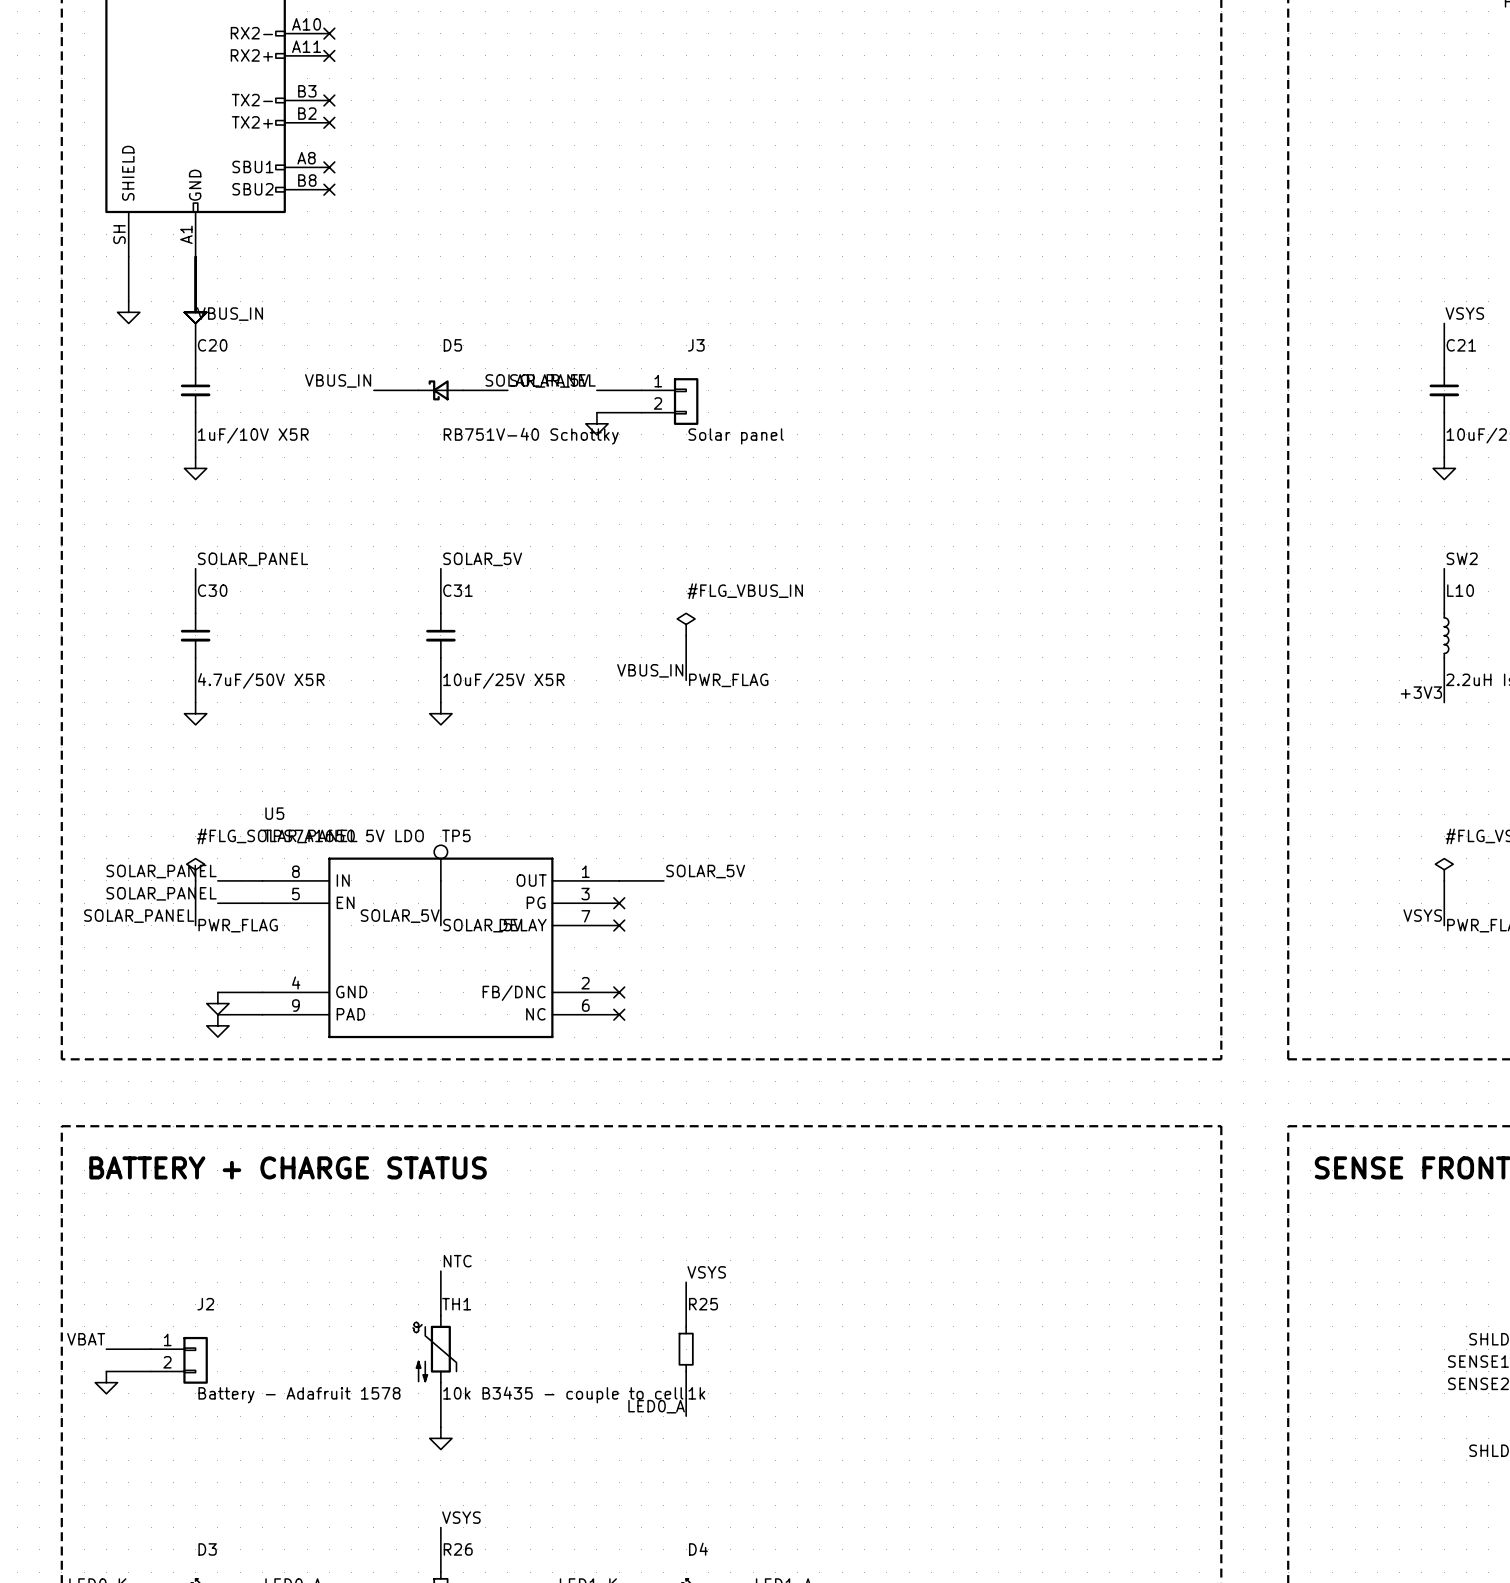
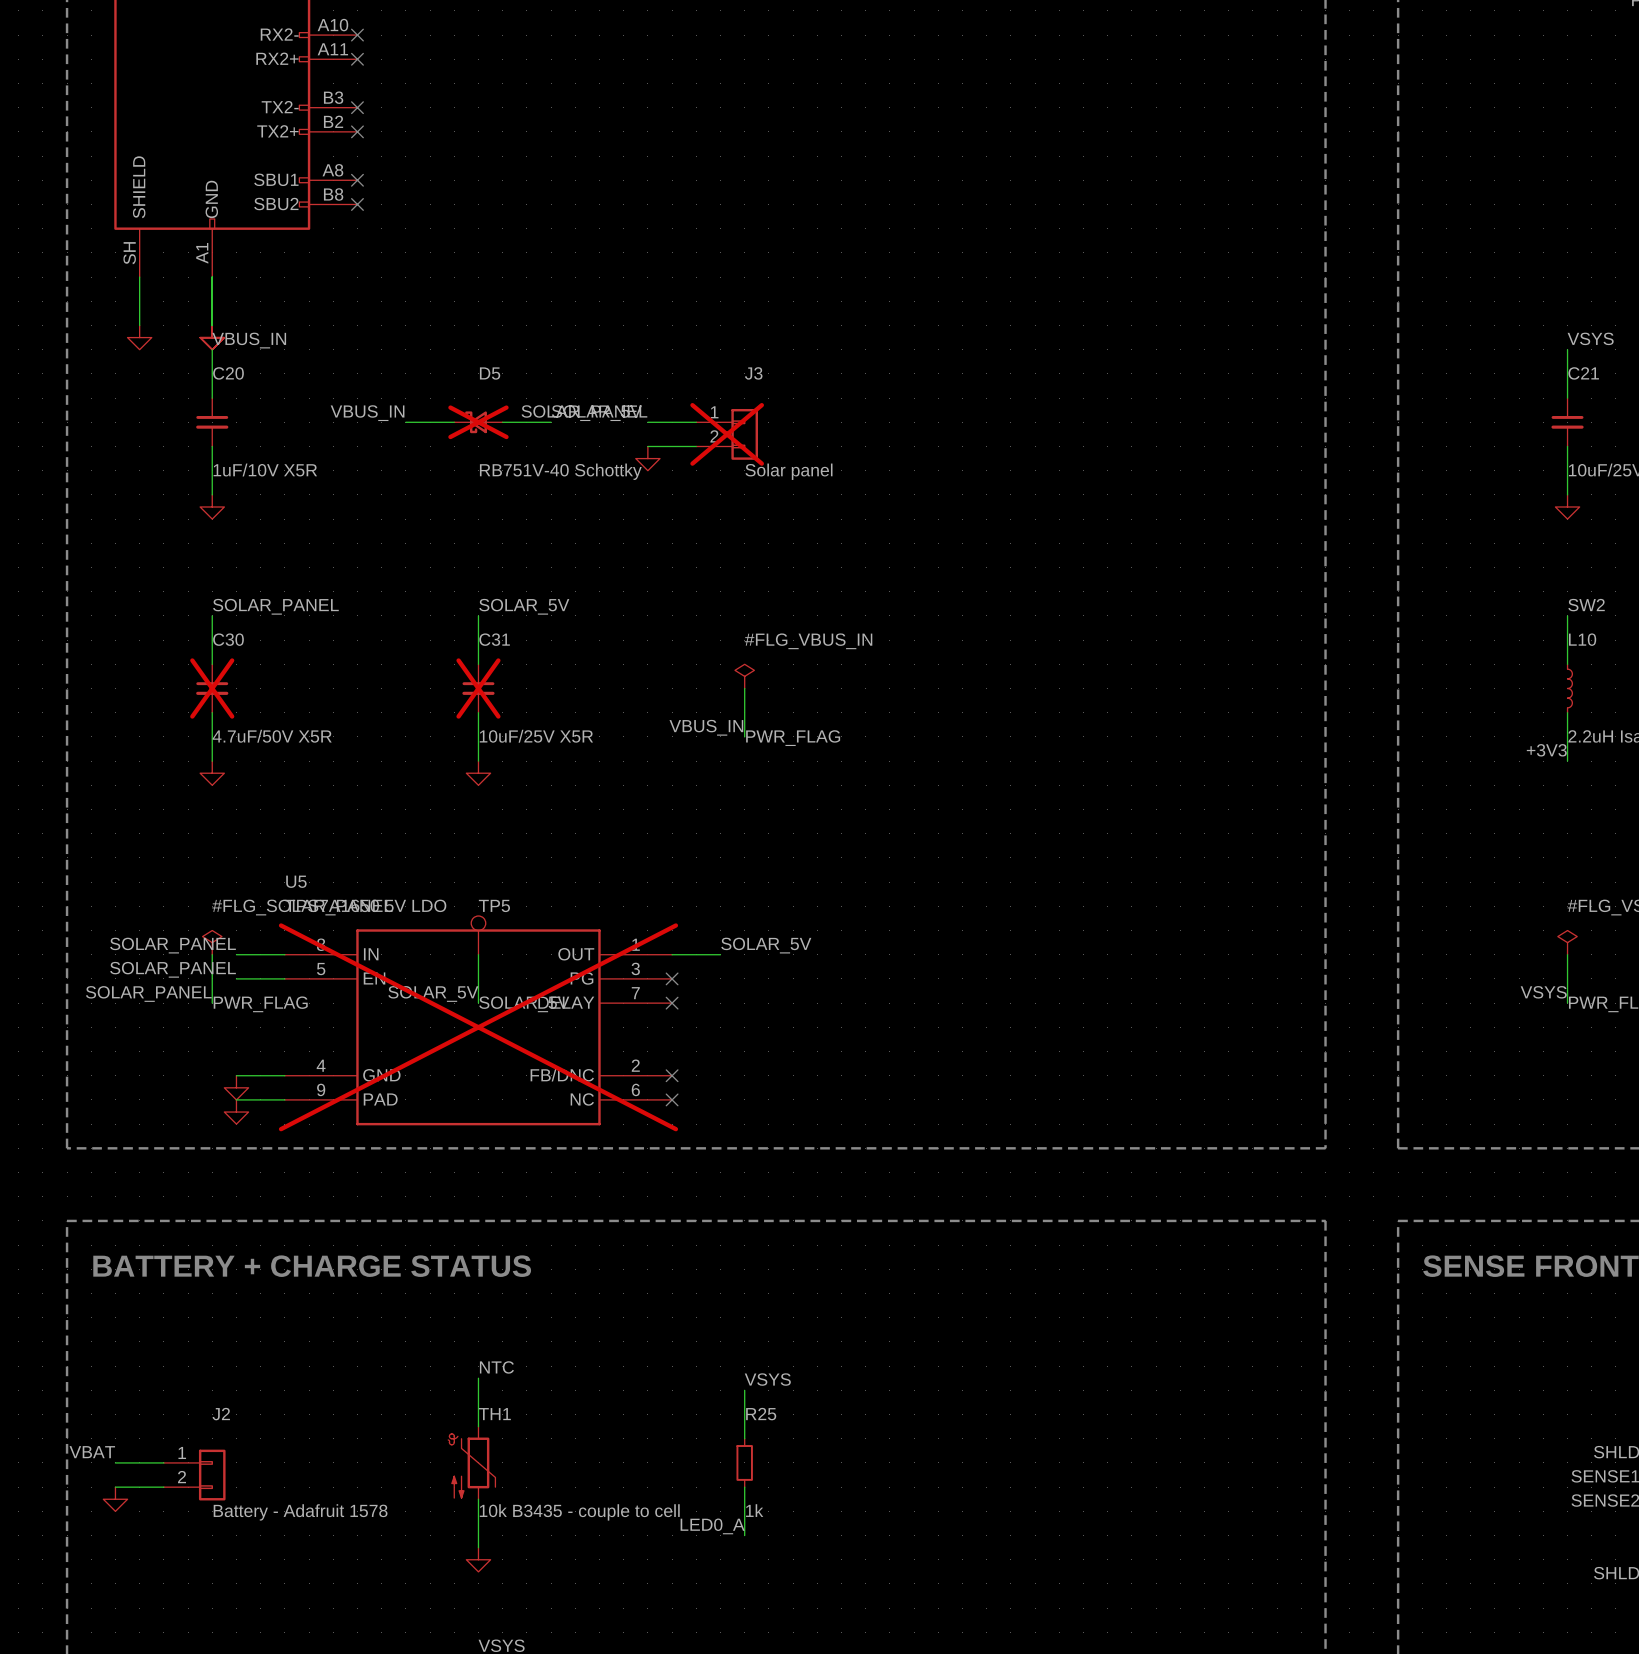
D5 do-not-place cross: none -> (478, 422)
J3 do-not-place cross: none -> (727, 434)
C30 do-not-place cross: none -> (212, 688)
C31 do-not-place cross: none -> (478, 688)
U5 do-not-place cross: none -> (478, 1027)

